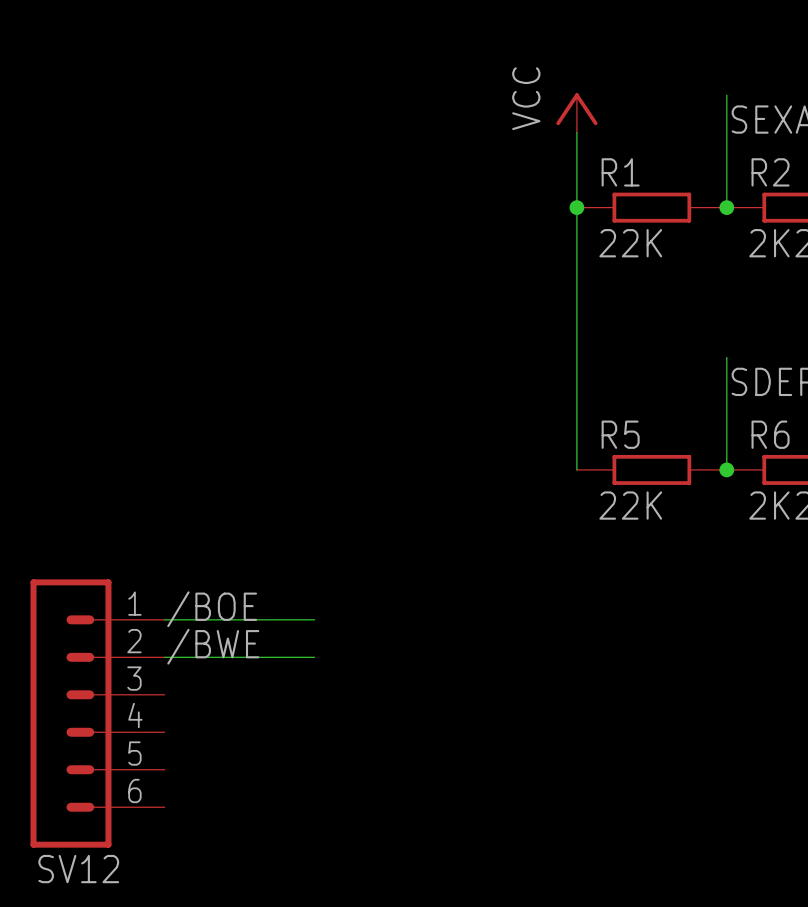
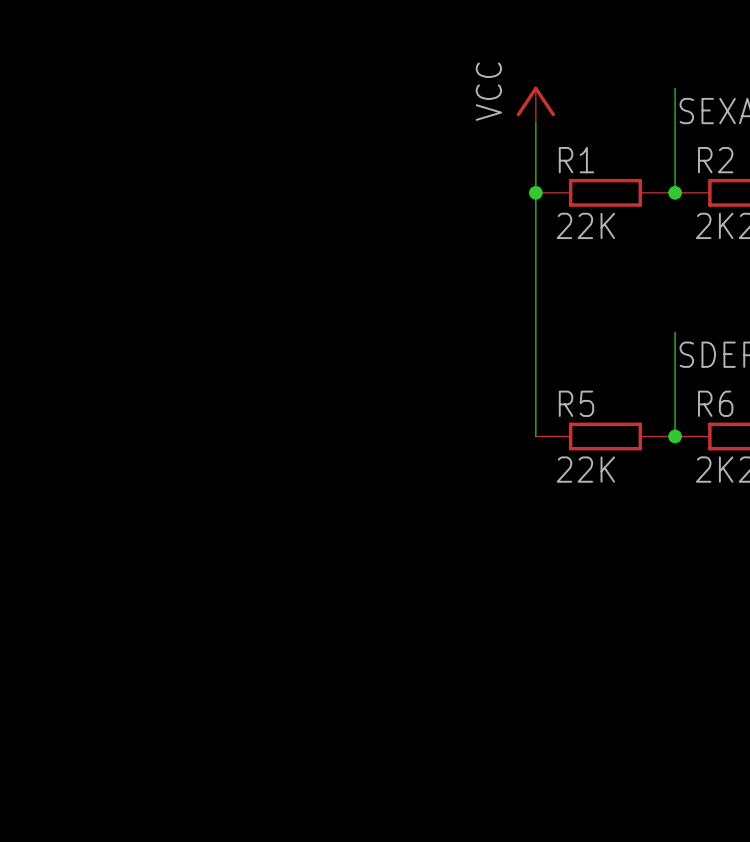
label: /BOE (212, 609) -> none
wire: (164, 619) (314, 619) -> none
label: /BWE (213, 646) -> none
wire: (164, 657) (314, 657) -> none
SV12: (97, 713) -> none

